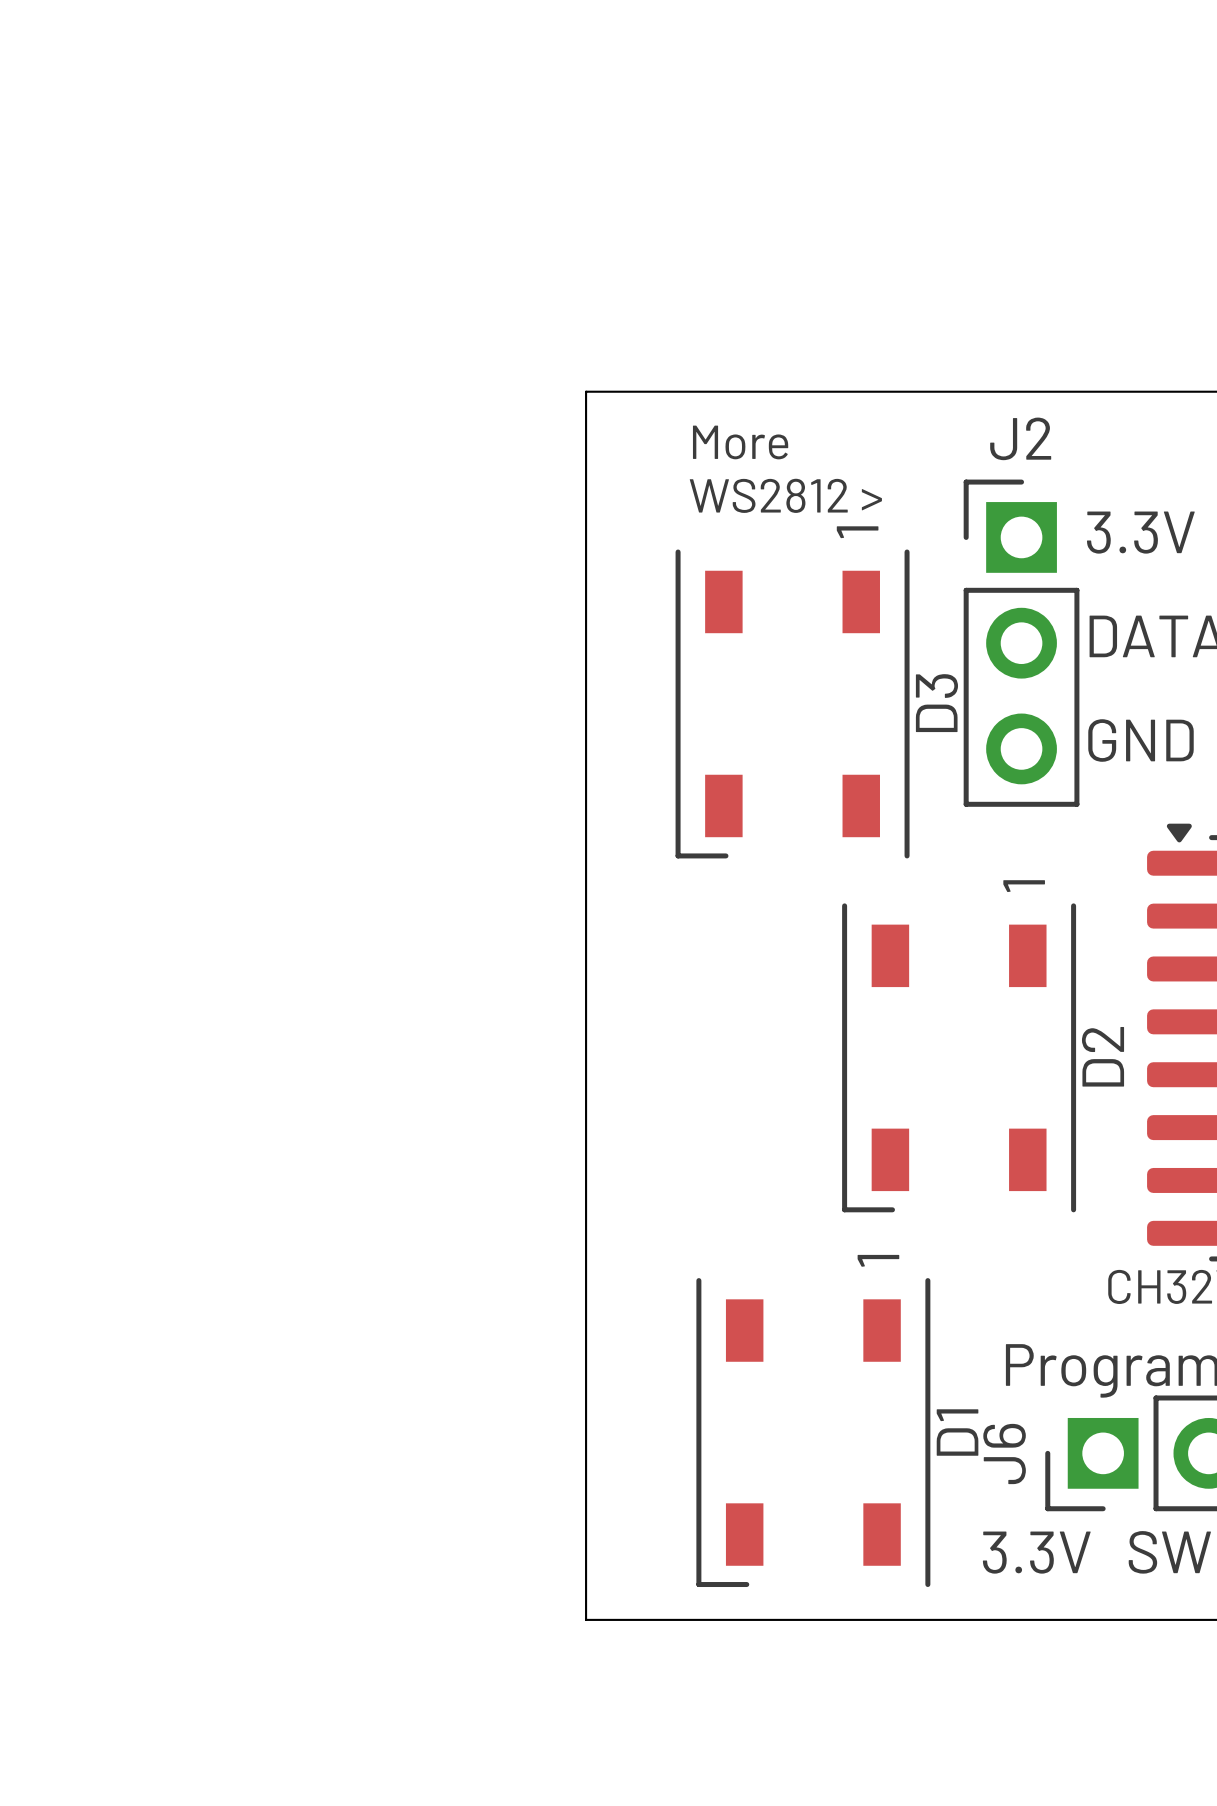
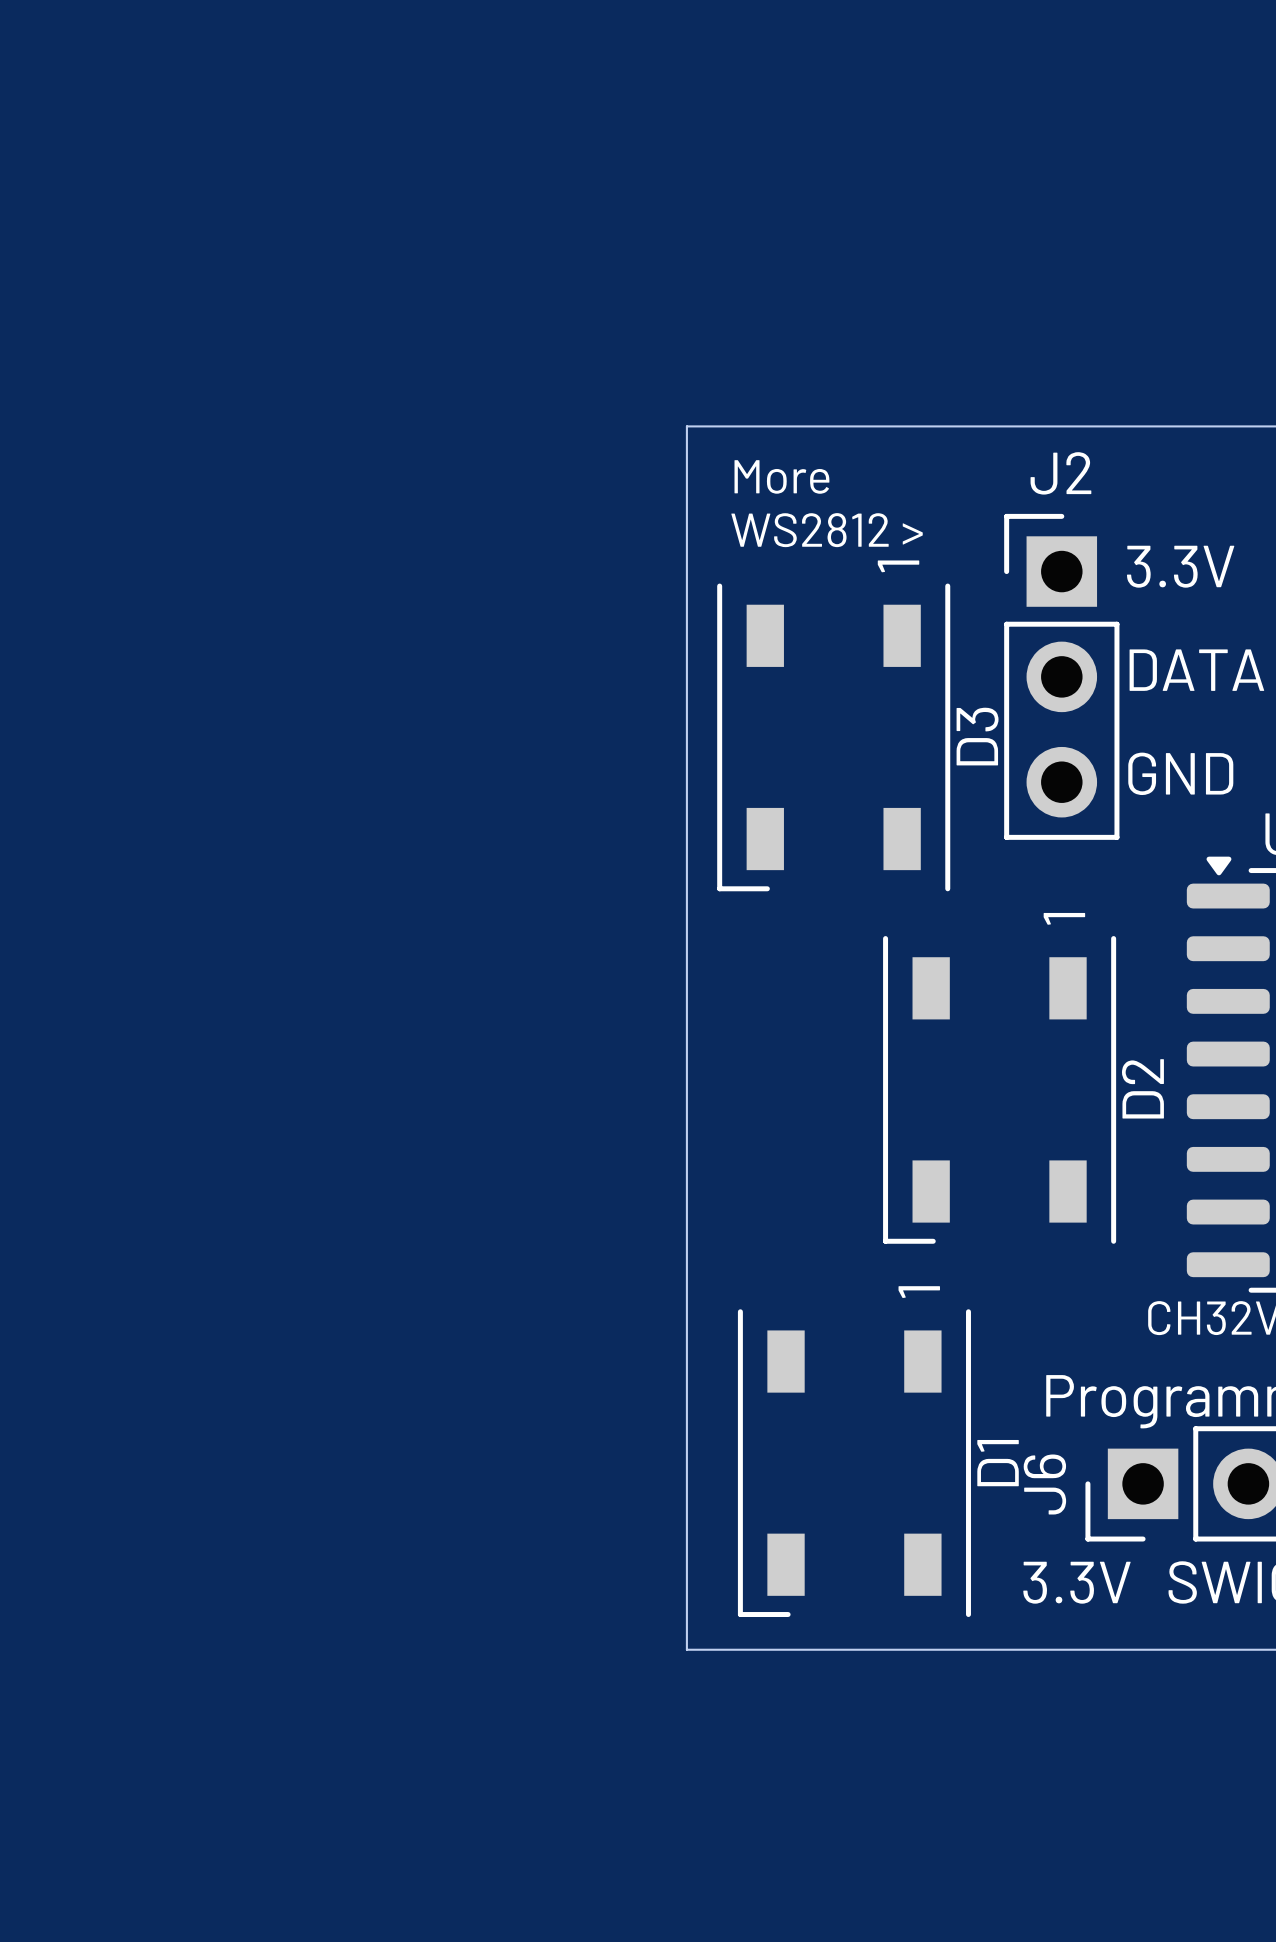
board edge: (645, 391) (586, 391) (586, 1619) (645, 1619) -> (686, 426) (686, 1649)

